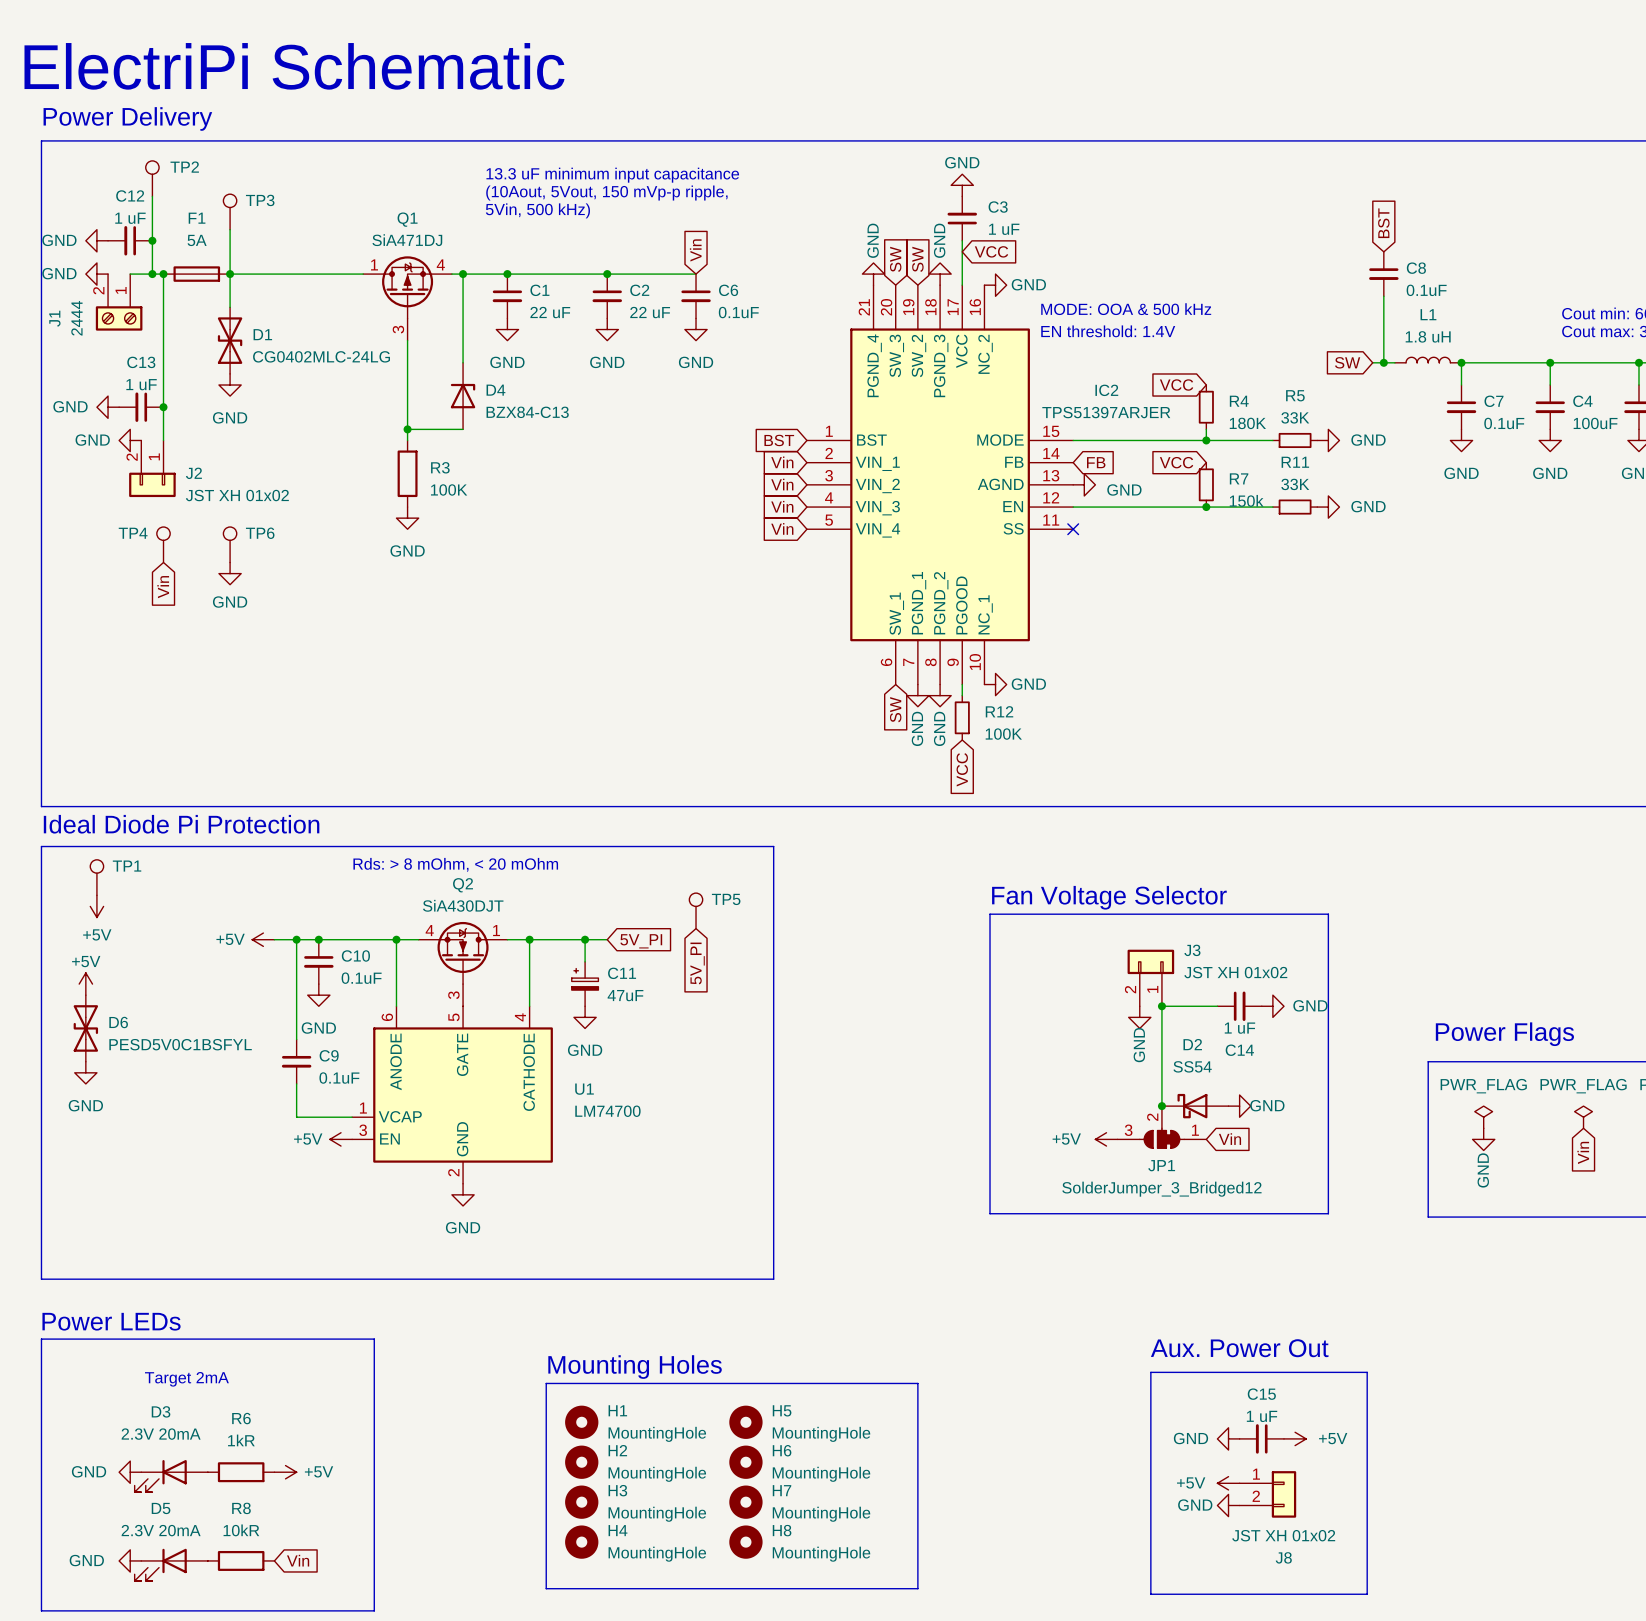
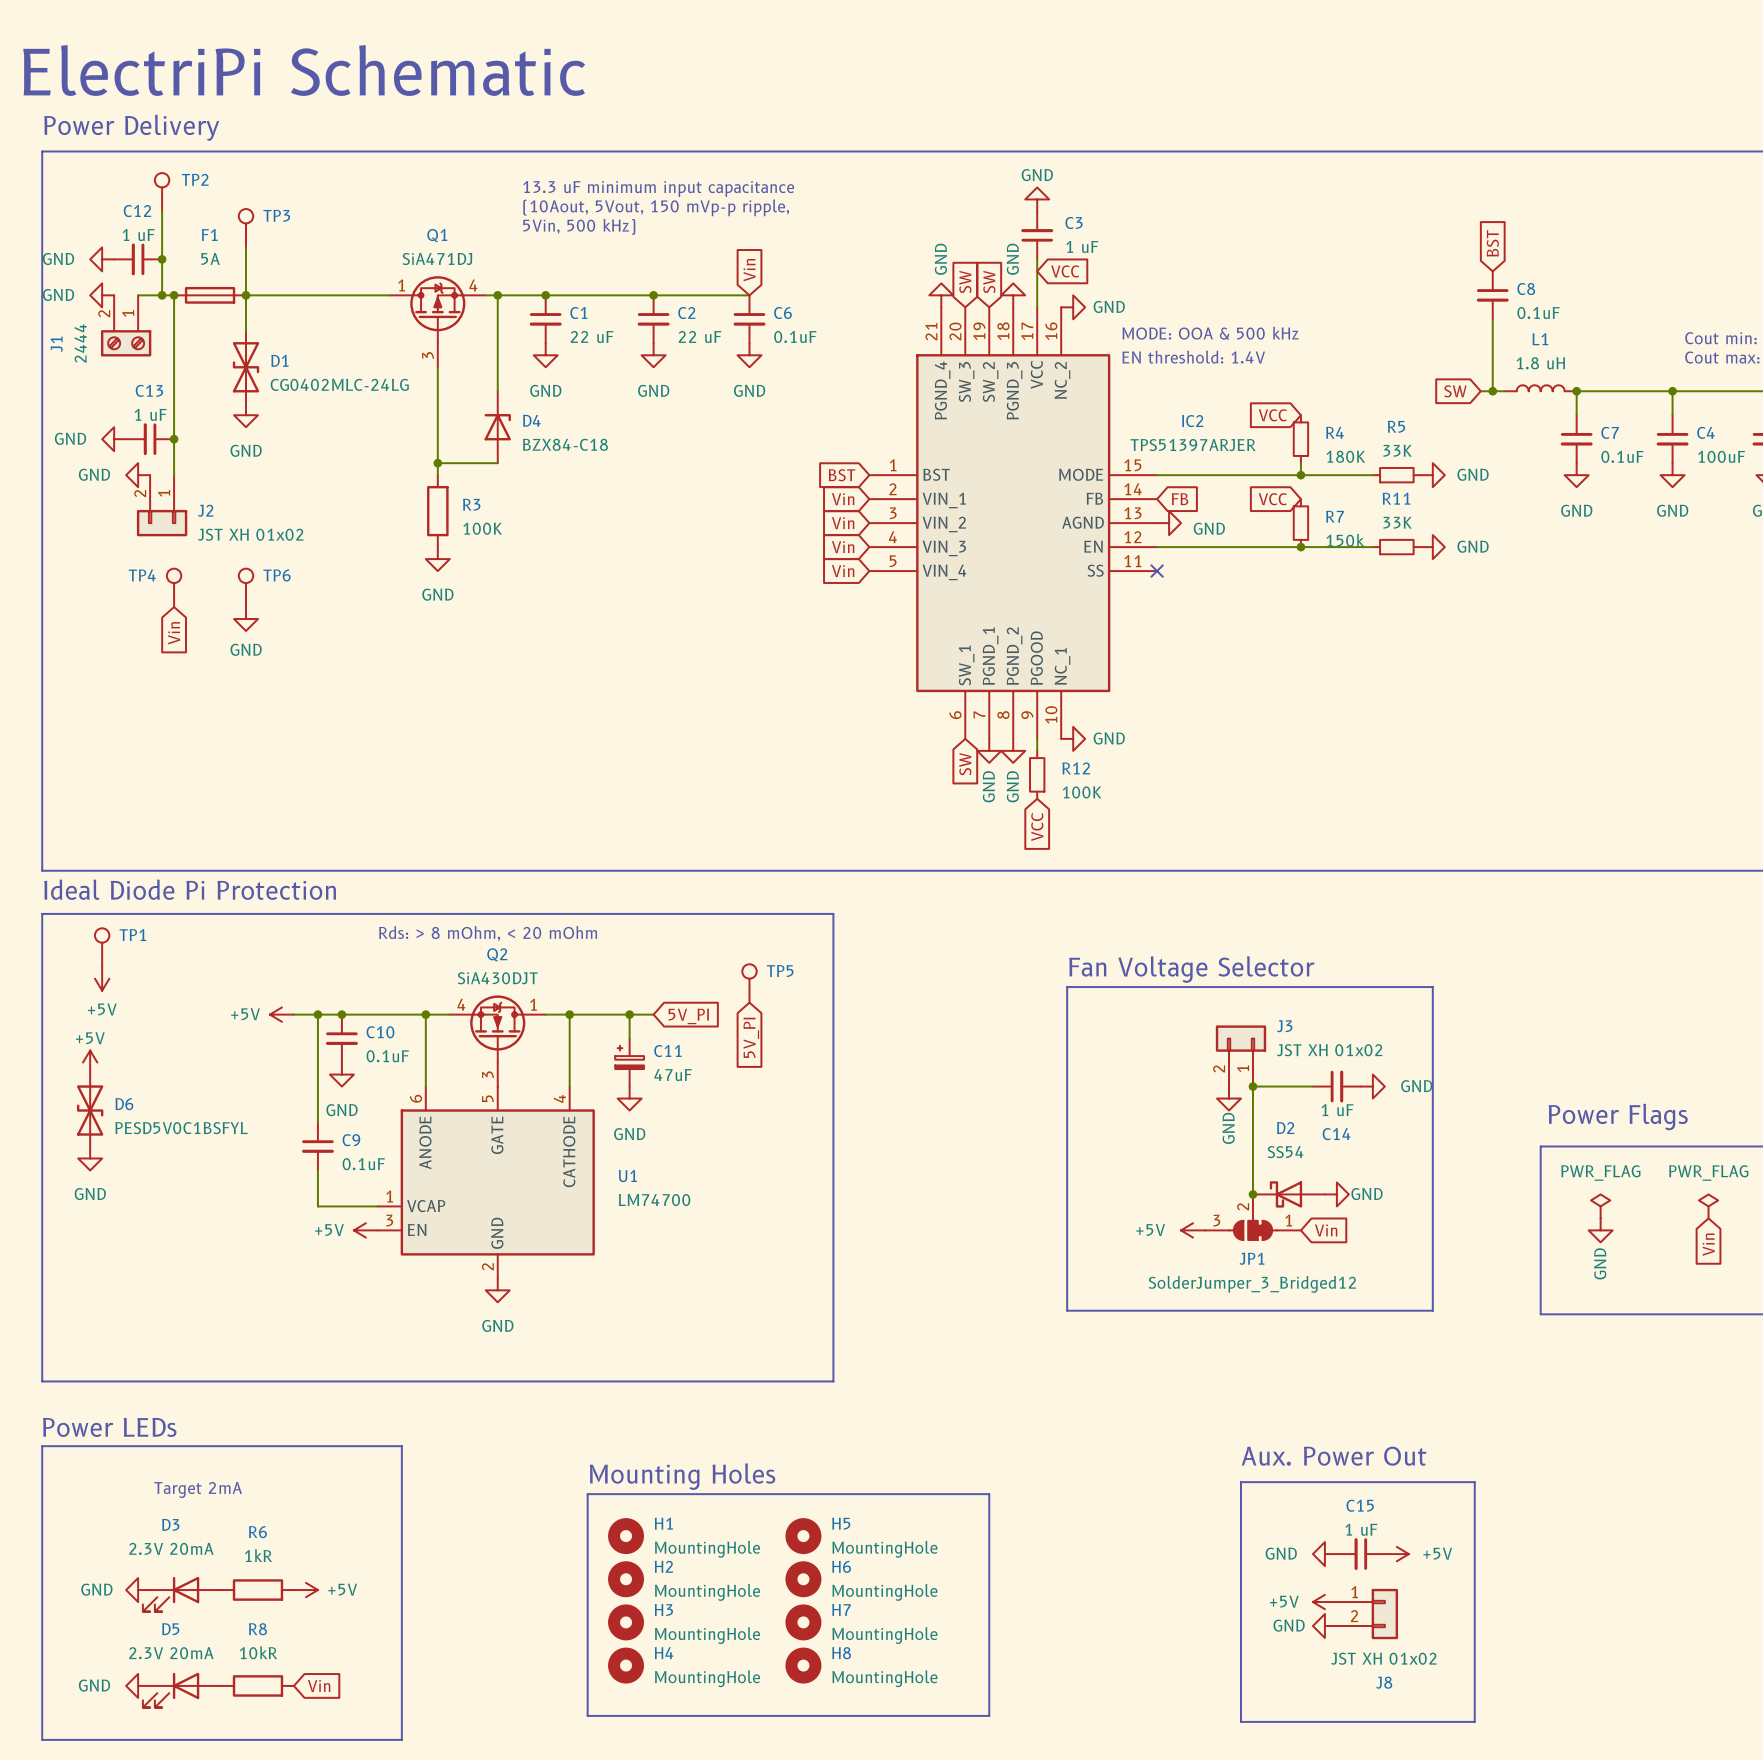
D4 value: BZX84-C13 (527, 412) -> BZX84-C18 (565, 444)

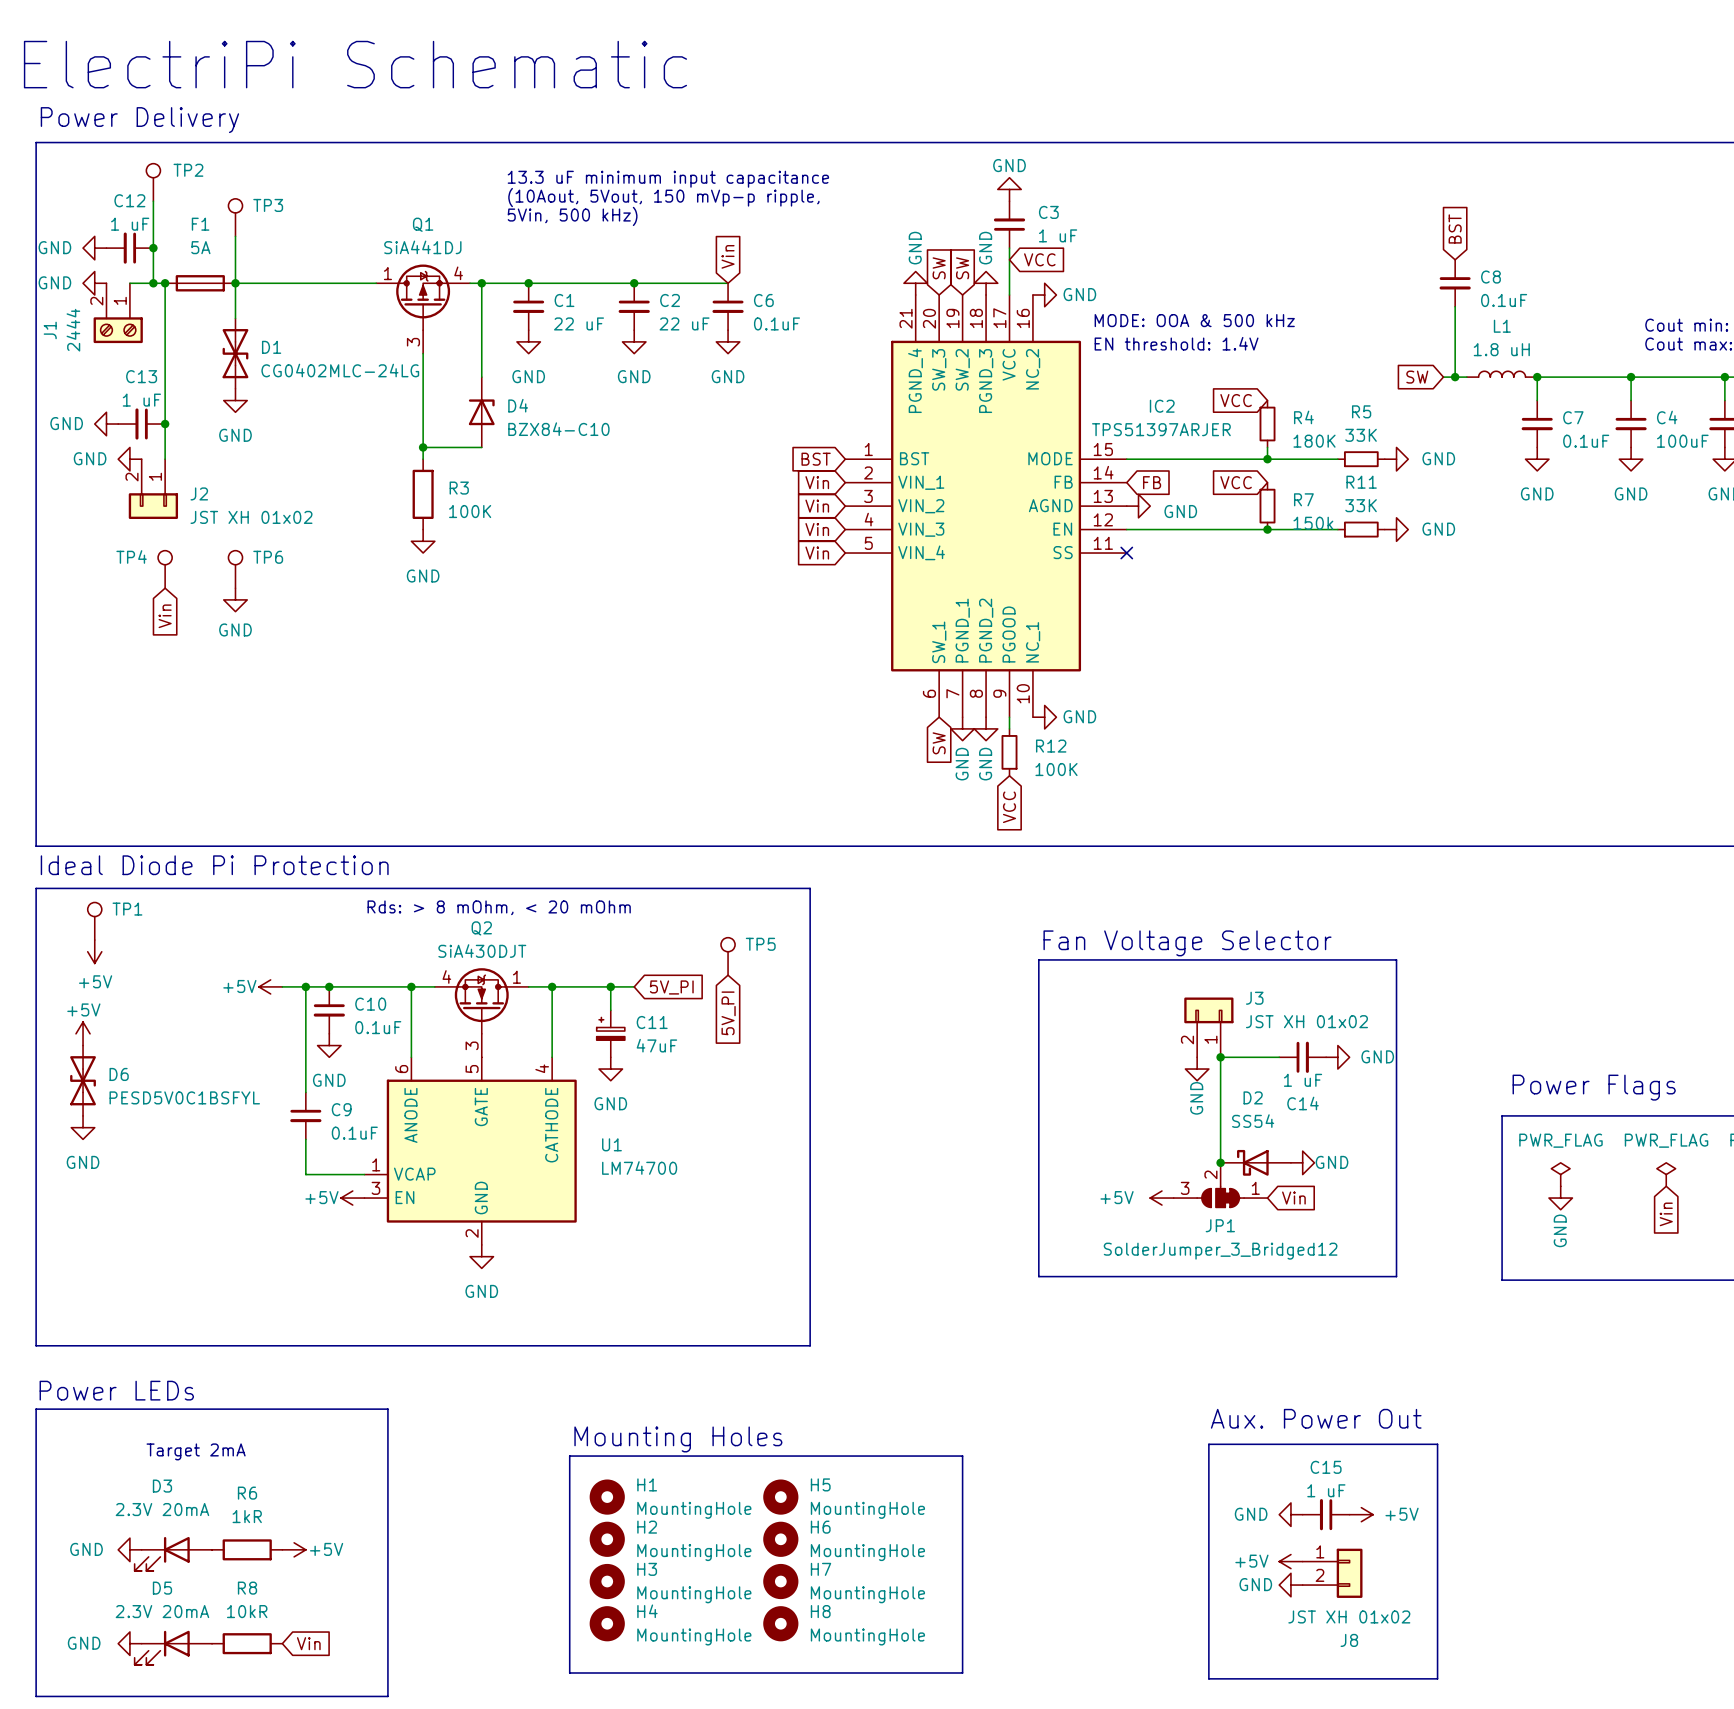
Q1 value: SiA471DJ (437, 259) -> SiA441DJ (422, 247)
D4 value: BZX84-C18 (565, 444) -> BZX84-C10 (558, 429)

